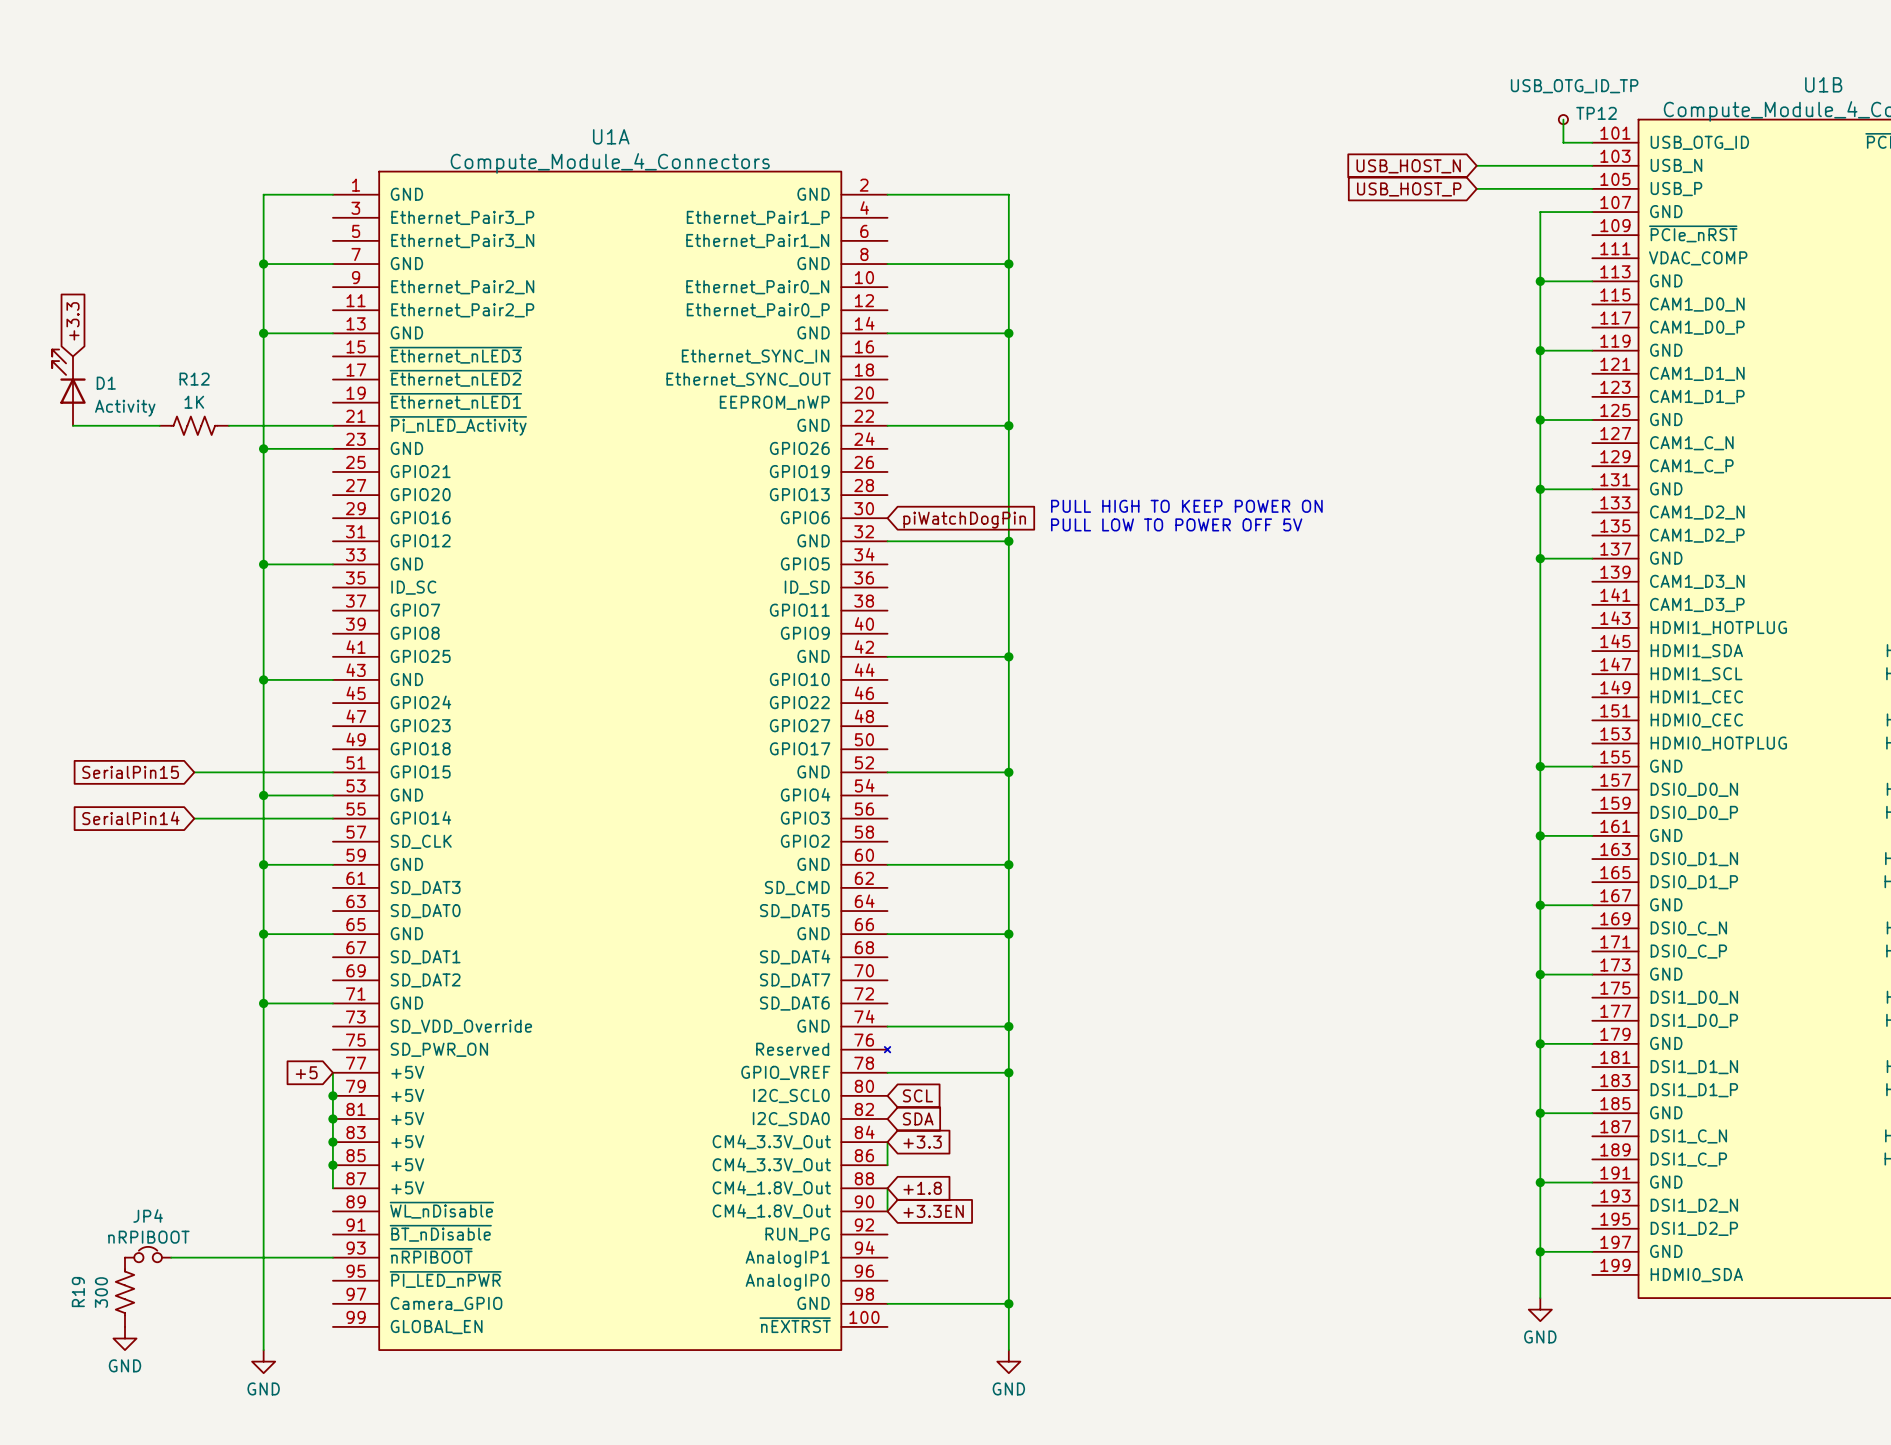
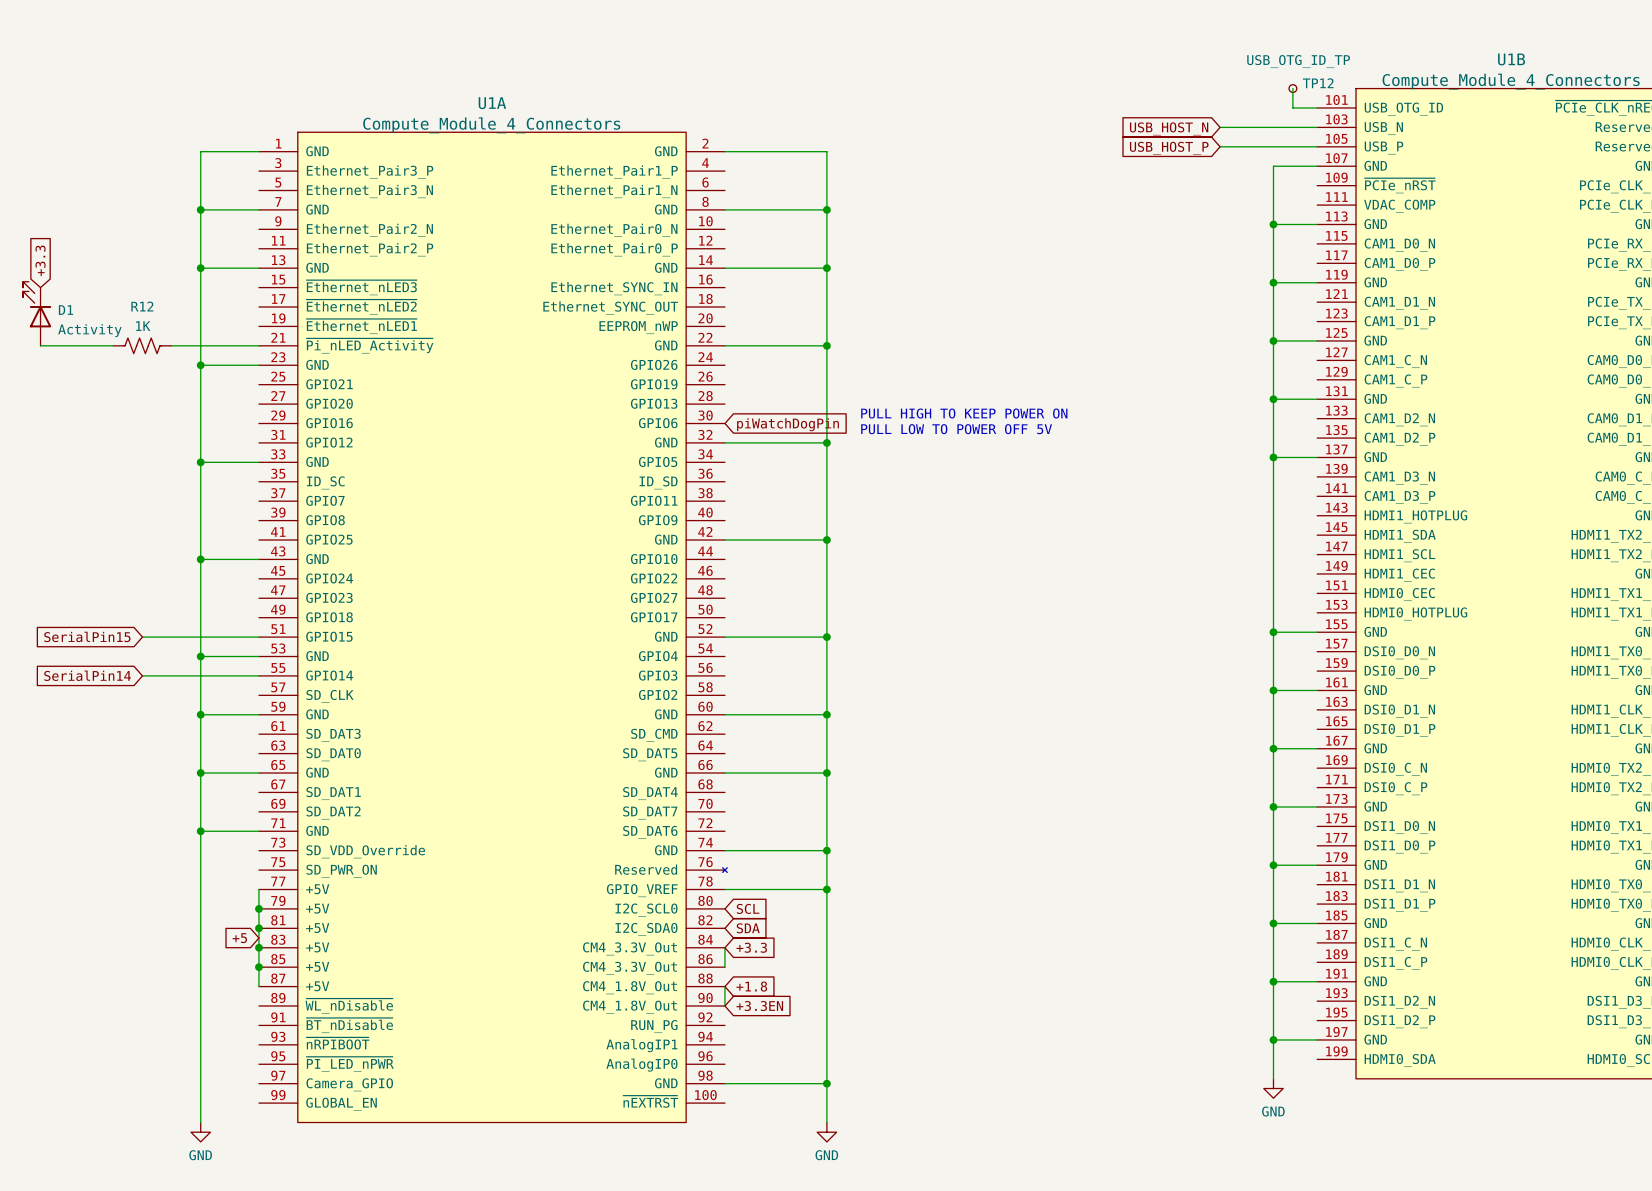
global label position: +5 (306, 1072) -> +5 (239, 938)
JP4: nRPIBOOT (148, 1254) -> none
wire: (171, 1257) (332, 1257) -> none
R19: 300 (124, 1292) -> none
power symbol: GND (124, 1338) -> none

